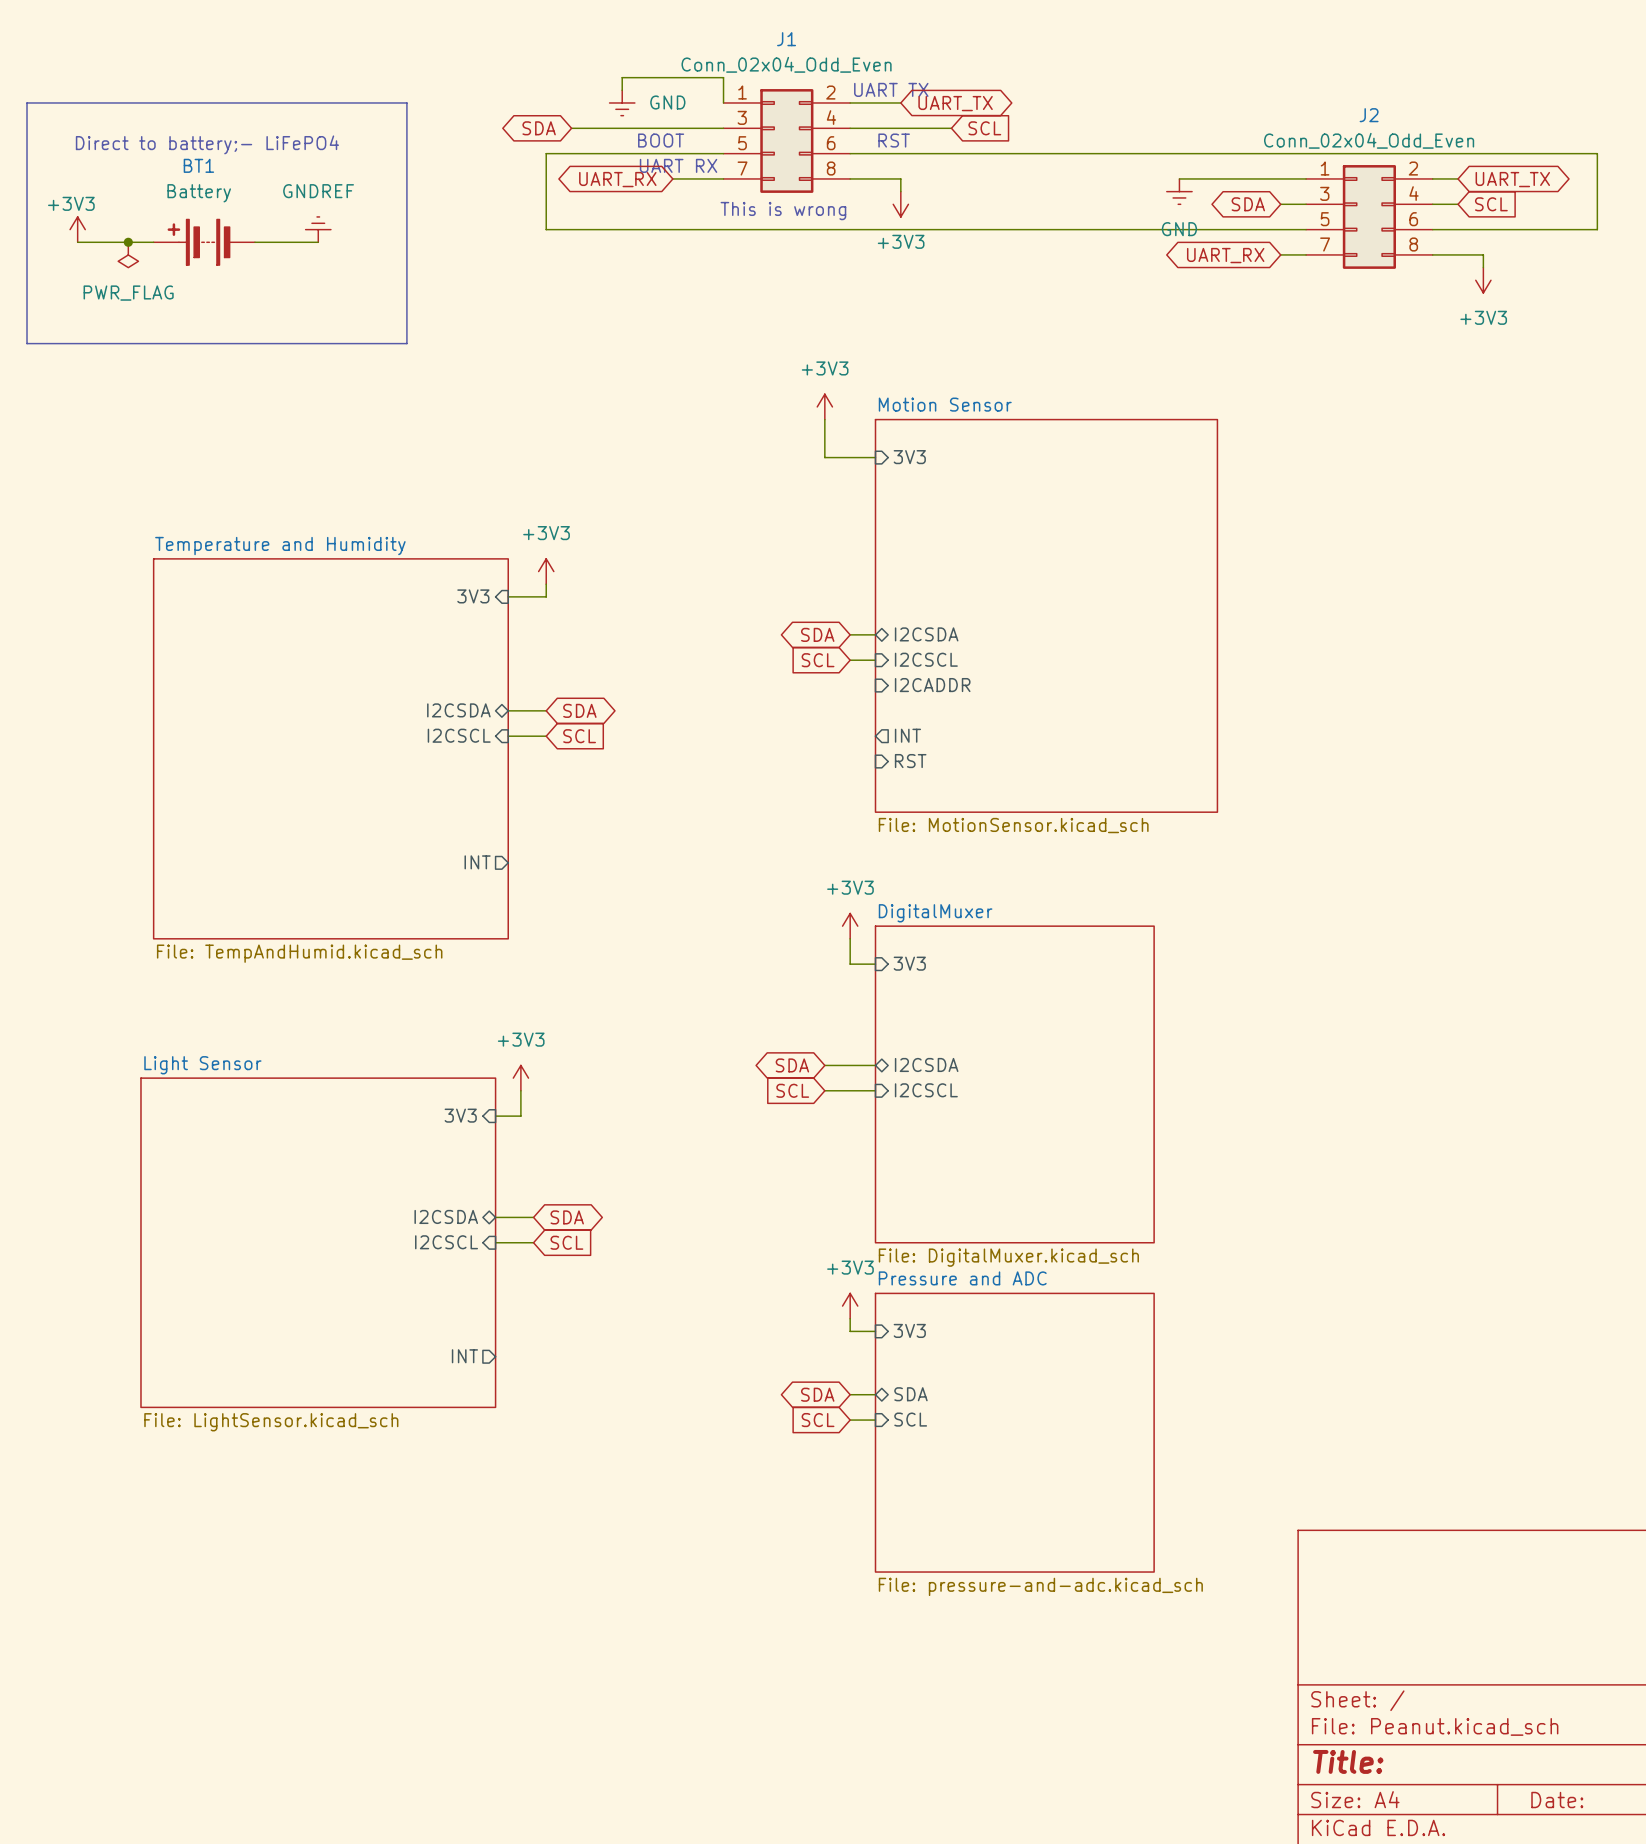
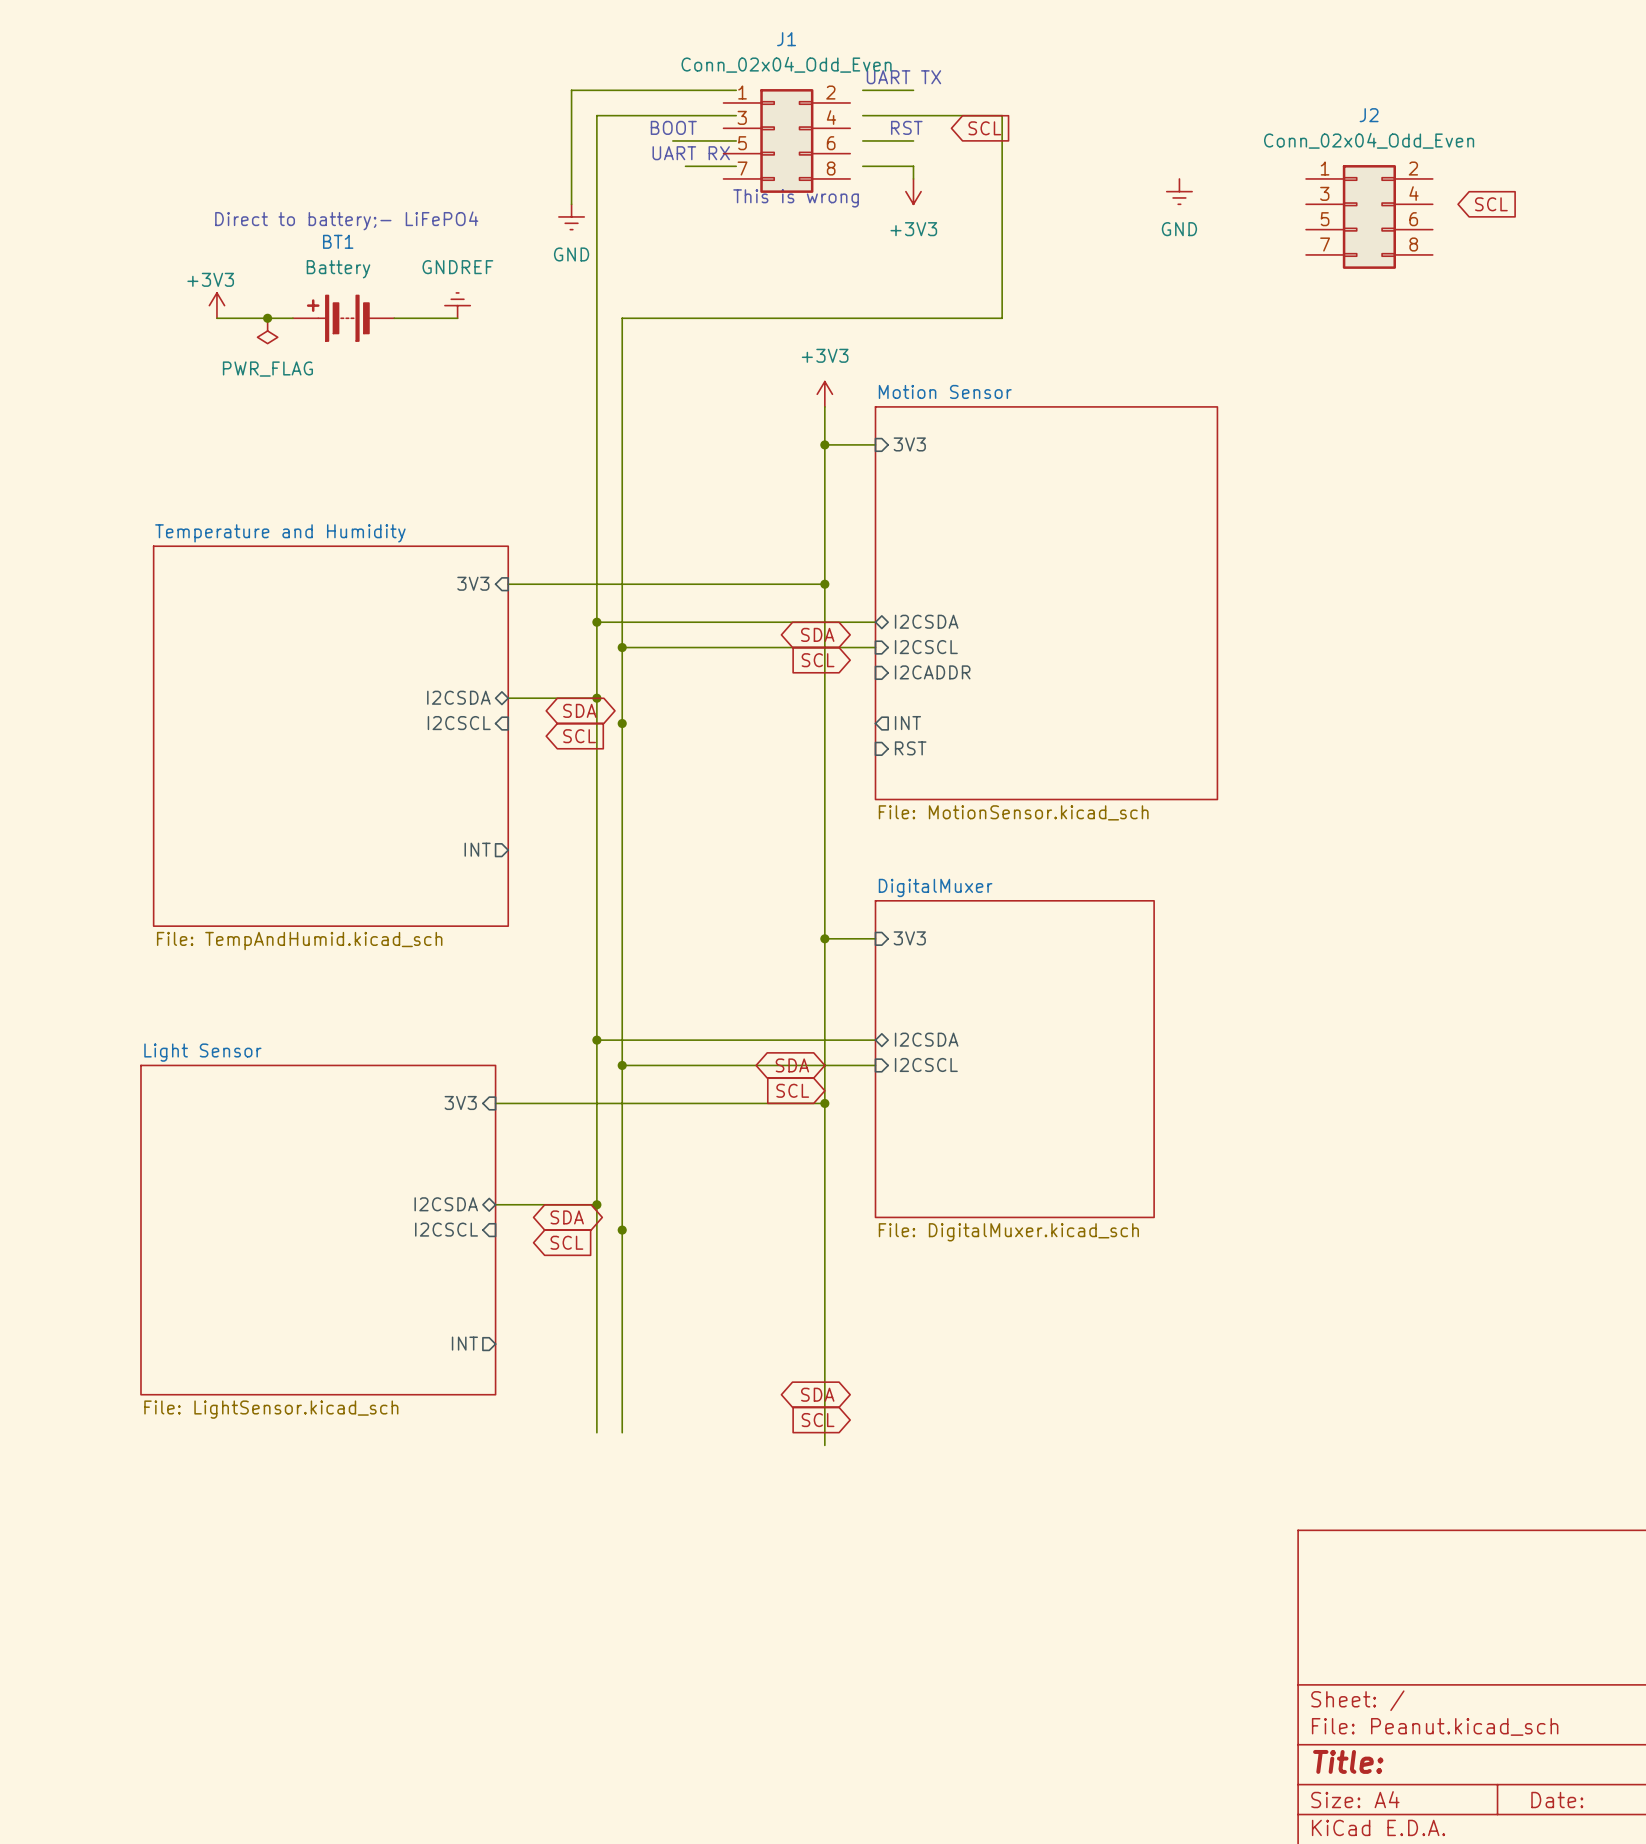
text position: UART TX (891, 89) -> UART TX (903, 77)
wire: (622, 90) (622, 77) (723, 77) (723, 102) -> none
wire: none -> (736, 90) (571, 90) (571, 204)
line: (27, 102) (406, 102) (406, 343) (27, 343) (27, 102) -> none
power symbol position: GND (622, 102) -> GND (571, 216)
power symbol text position: GND (667, 102) -> GND (571, 254)
wire: (850, 102) (900, 102) -> (862, 90) (913, 90)
global label: UART_TX (955, 103) -> none
wire: none -> (736, 115) (596, 115) (596, 1432)
wire: none -> (862, 115) (1002, 115) (1002, 318) (622, 318) (622, 1432)
global label: SDA (539, 128) -> none
wire: (571, 128) (723, 128) -> none
wire: (850, 128) (951, 128) -> none
text position: BOOT (661, 140) -> BOOT (673, 127)
wire: none -> (672, 140) (736, 140)
wire: none -> (862, 140) (913, 140)
text position: RST (894, 140) -> RST (906, 127)
text position: Direct to battery;- LiFePO4 (207, 144) -> Direct to battery;- LiFePO4 (346, 220)
wire: (723, 153) (546, 153) (546, 229) (1306, 229) -> none
wire: (850, 153) (1597, 153) (1597, 229) (1432, 229) -> none
text position: UART RX (678, 165) -> UART RX (691, 153)
wire: (672, 178) (723, 178) -> (685, 166) (736, 166)
wire: (850, 178) (900, 178) (900, 191) -> (862, 166) (913, 166) (913, 178)
wire: (1179, 178) (1306, 178) -> none
wire: (1432, 178) (1458, 178) -> none
global label: UART_RX (617, 179) -> none
global label: UART_TX (1512, 179) -> none
power symbol position: +3V3 (900, 204) -> +3V3 (913, 191)
global label: SDA (1248, 204) -> none
wire: (1280, 204) (1306, 204) -> none
wire: (1432, 204) (1458, 204) -> none
text position: This is wrong (783, 211) -> This is wrong (796, 198)
power symbol position: +3V3 (77, 229) -> +3V3 (216, 305)
power symbol position: GNDREF (318, 229) -> GNDREF (457, 305)
wire: (77, 242) (153, 242) -> (216, 318) (292, 318)
junction: (128, 242) -> none
BT1 position: (204, 242) -> (343, 318)
wire: (254, 242) (318, 242) -> (394, 318) (457, 318)
power symbol position: PWR_FLAG (128, 254) -> PWR_FLAG (267, 330)
wire: (1280, 254) (1306, 254) -> none
wire: (1432, 254) (1483, 254) (1483, 267) -> none
global label: UART_RX (1225, 255) -> none
power symbol: +3V3 (1483, 280) -> none
junction: none -> (267, 318)
power symbol position: +3V3 (824, 406) -> +3V3 (824, 394)
wire: none -> (824, 444) (875, 444)
junction: none -> (824, 444)
wire: (824, 457) (875, 457) -> (824, 457) (824, 1445)
sheet pin position: 3V3 (909, 457) -> 3V3 (909, 444)
power symbol: +3V3 (546, 571) -> none
wire: none -> (508, 584) (824, 584)
wire: (546, 584) (546, 596) (508, 596) -> none
junction: none -> (824, 584)
sheet pin position: 3V3 (473, 596) -> 3V3 (473, 583)
sheet Motion Sensor position: (1046, 615) -> (1046, 603)
wire: none -> (596, 622) (875, 622)
junction: none -> (596, 622)
wire: (850, 634) (875, 634) -> none
sheet pin position: I2CSDA (926, 634) -> I2CSDA (926, 621)
wire: none -> (622, 647) (875, 647)
junction: none -> (622, 647)
sheet pin position: I2CSCL (926, 659) -> I2CSCL (926, 647)
wire: (850, 660) (875, 660) -> none
sheet pin position: I2CADDR (932, 685) -> I2CADDR (932, 672)
wire: none -> (508, 698) (596, 698)
junction: none -> (596, 698)
sheet pin position: I2CSDA (458, 710) -> I2CSDA (458, 697)
wire: (508, 710) (546, 710) -> none
junction: none -> (622, 723)
sheet pin position: I2CSCL (459, 735) -> I2CSCL (459, 723)
sheet pin position: INT (907, 735) -> INT (907, 723)
wire: (508, 736) (546, 736) -> none
sheet Temperature and Humidity position: (330, 748) -> (330, 736)
sheet pin position: RST (910, 761) -> RST (910, 748)
sheet pin position: INT (477, 862) -> INT (477, 849)
power symbol: +3V3 (850, 926) -> none
junction: none -> (824, 938)
wire: (850, 938) (850, 964) (875, 964) -> none
sheet pin position: 3V3 (909, 963) -> 3V3 (909, 938)
sheet pin: none -> I2CSDA (926, 1039)
wire: none -> (596, 1040) (875, 1040)
junction: none -> (596, 1040)
sheet pin shape: bidirectional (926, 1064) -> input (926, 1064)
sheet pin: I2CSDA (926, 1064) -> I2CSCL (926, 1064)
wire: none -> (622, 1065) (824, 1065)
junction: none -> (622, 1065)
power symbol: +3V3 (520, 1078) -> none
sheet DigitalMuxer position: (1014, 1084) -> (1014, 1059)
wire: (520, 1090) (520, 1116) (495, 1116) -> none
wire: (824, 1090) (875, 1090) -> (824, 938) (875, 938)
sheet pin: I2CSCL (926, 1090) -> none
wire: none -> (495, 1103) (824, 1103)
junction: none -> (824, 1103)
sheet pin position: 3V3 (460, 1115) -> 3V3 (460, 1102)
wire: none -> (495, 1204) (596, 1204)
junction: none -> (596, 1204)
sheet pin position: I2CSDA (446, 1216) -> I2CSDA (446, 1204)
wire: (495, 1217) (533, 1217) -> none
junction: none -> (622, 1230)
sheet Light Sensor position: (318, 1242) -> (318, 1230)
sheet pin position: I2CSCL (446, 1242) -> I2CSCL (446, 1229)
wire: (495, 1242) (533, 1242) -> none
power symbol: +3V3 (850, 1306) -> none
wire: (850, 1318) (850, 1331) (875, 1331) -> none
sheet pin: 3V3 (909, 1330) -> none
sheet pin position: INT (464, 1356) -> INT (464, 1343)
wire: (850, 1394) (875, 1394) -> none
sheet pin: SDA (910, 1394) -> none
sheet pin: SCL (910, 1419) -> none
wire: (850, 1420) (875, 1420) -> none
sheet Pressure and ADC: File: pressure-and-adc.kicad_sch (1014, 1432) -> none

